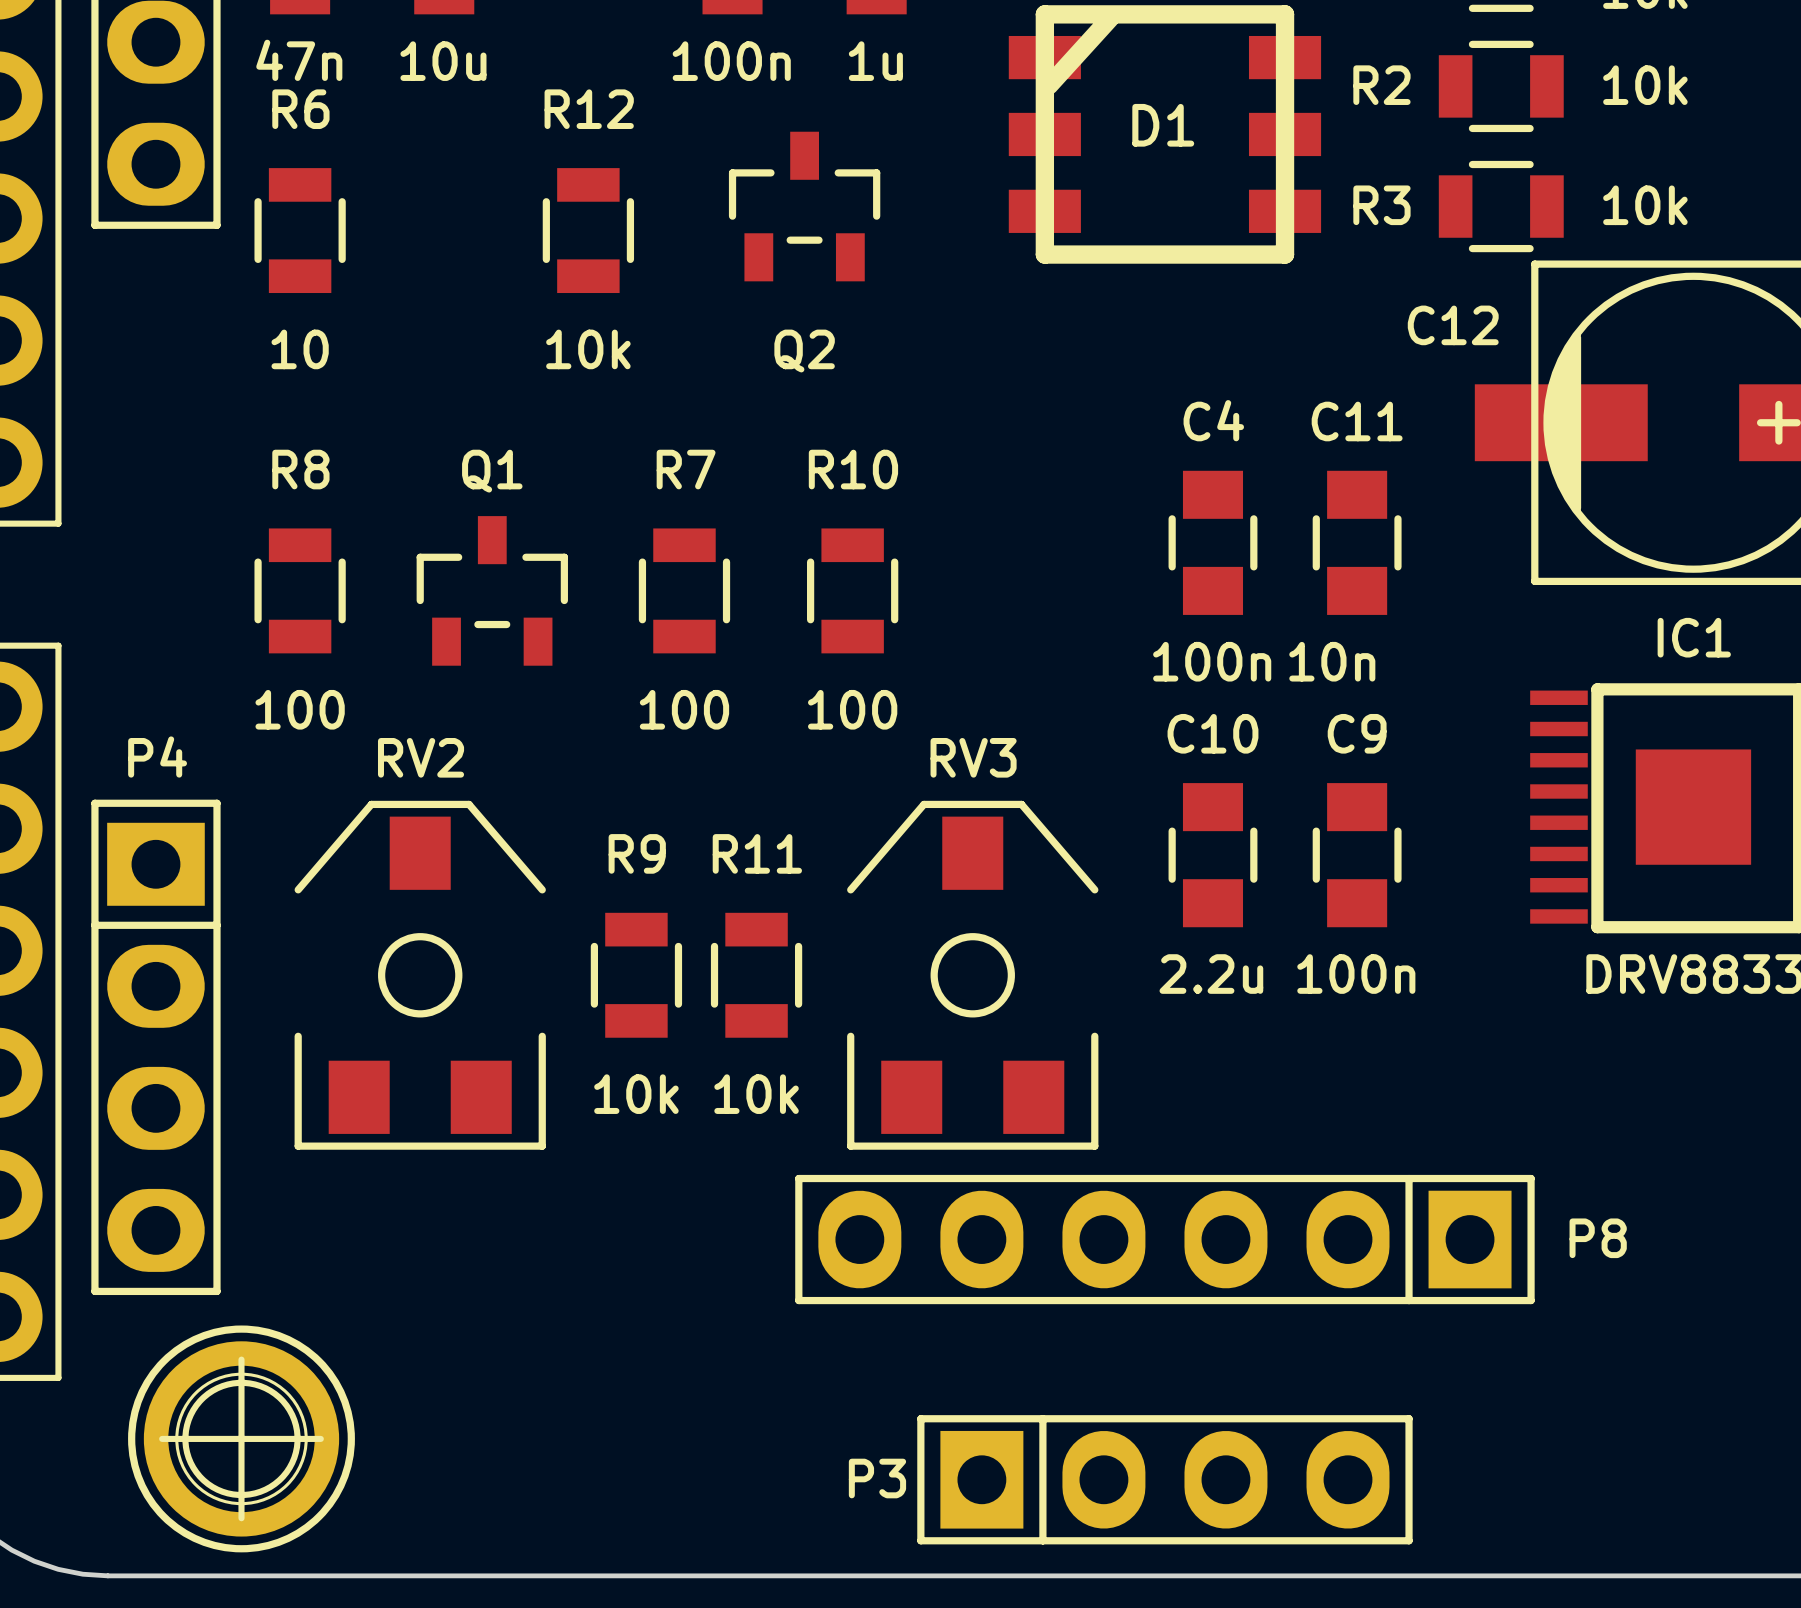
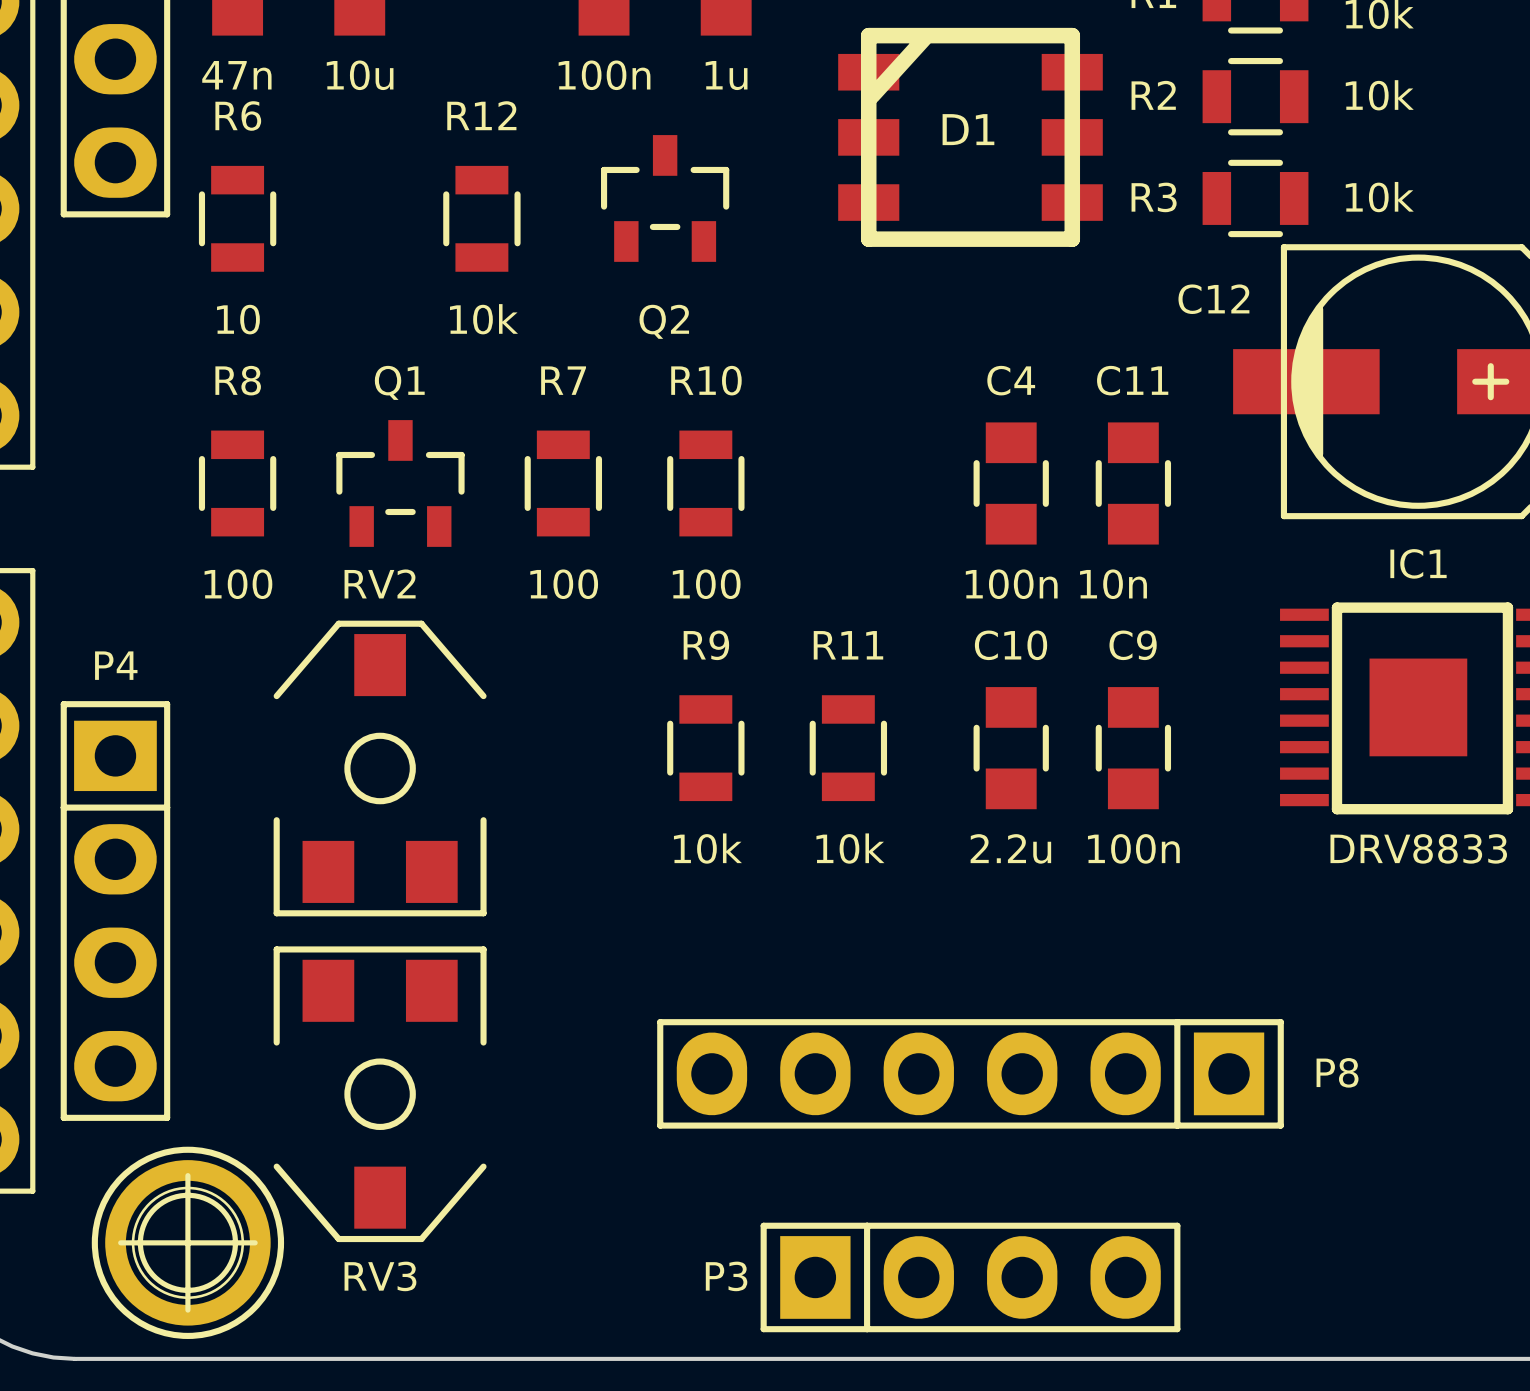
R8 position: (300, 590) -> (237, 483)
Q1 position: (492, 590) -> (400, 483)
R7 position: (684, 590) -> (563, 483)
R10 position: (852, 590) -> (705, 483)
RV2 position: (420, 975) -> (380, 768)
R9 position: (636, 975) -> (705, 748)
R11 position: (756, 975) -> (848, 748)
RV3 rotation: 0° (972, 975) -> 180° (380, 1094)
RV3 position: (972, 975) -> (380, 1094)

